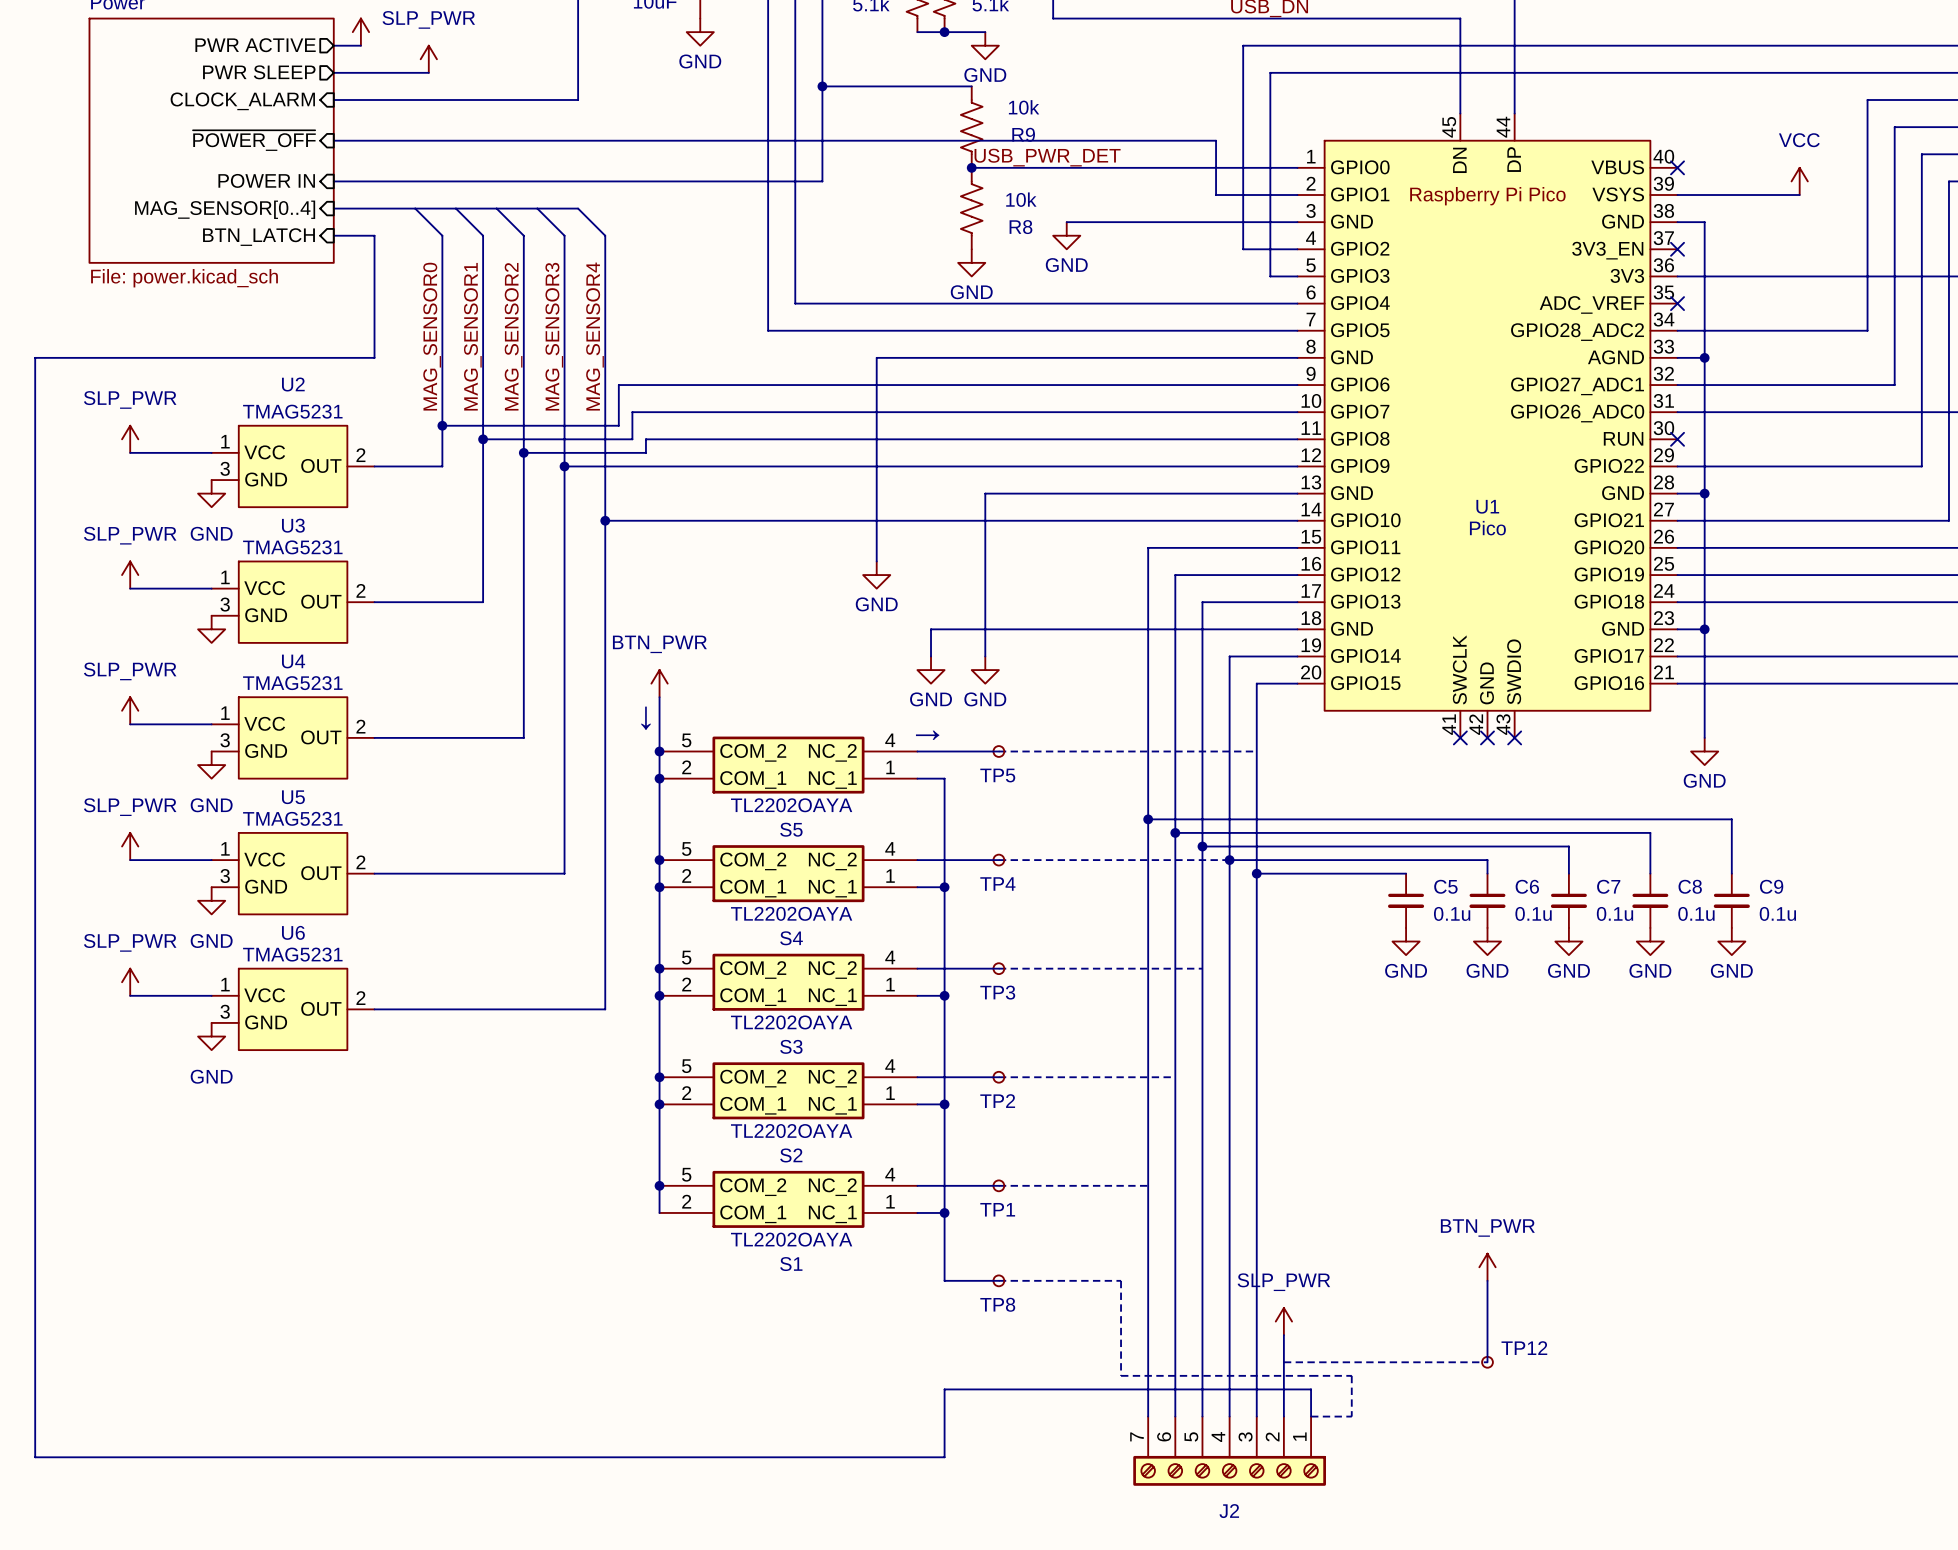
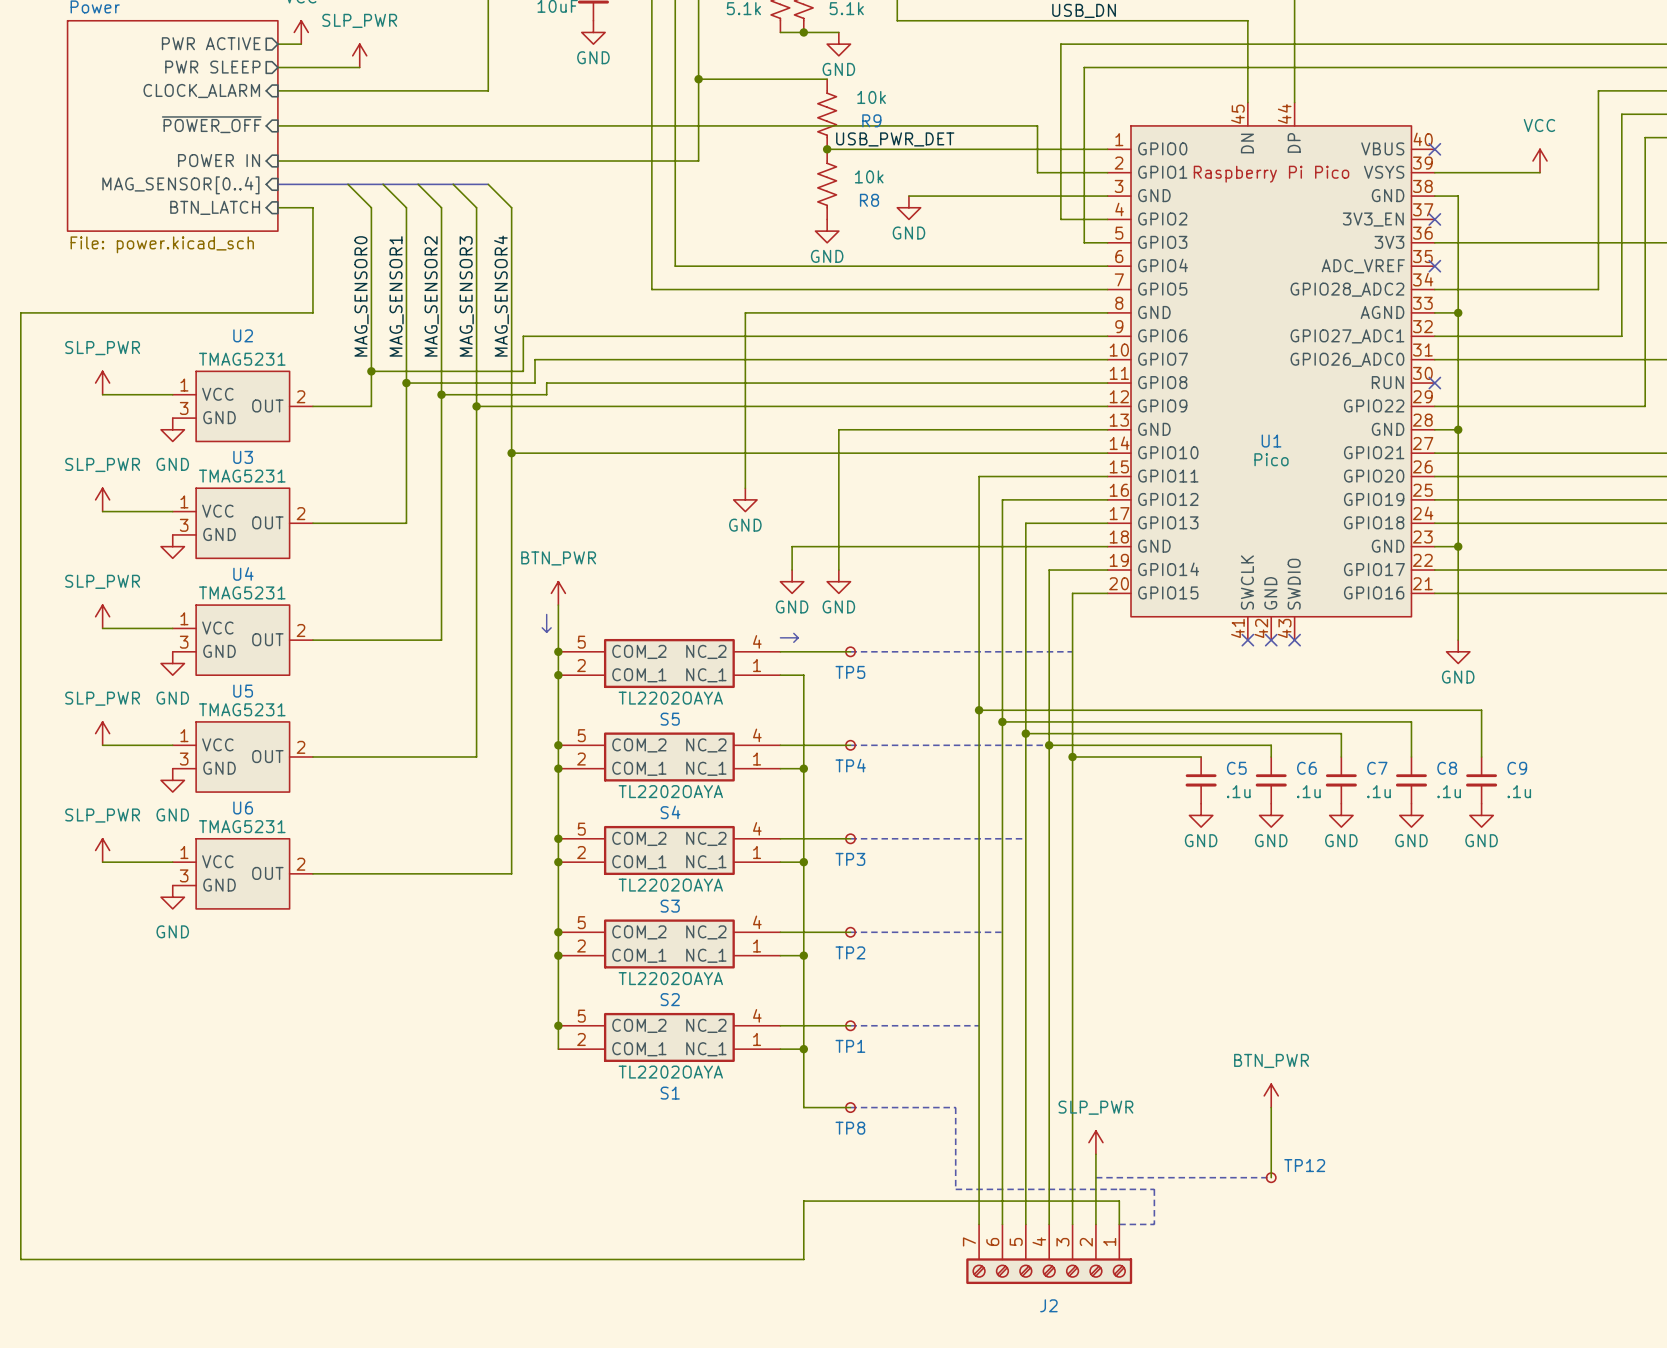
C5 value: 0.1u (1452, 913) -> .1u (1238, 791)
C6 value: 0.1u (1533, 913) -> .1u (1308, 791)
C7 value: 0.1u (1615, 913) -> .1u (1379, 791)
C8 value: 0.1u (1696, 913) -> .1u (1449, 791)
C9 value: 0.1u (1777, 913) -> .1u (1519, 791)

